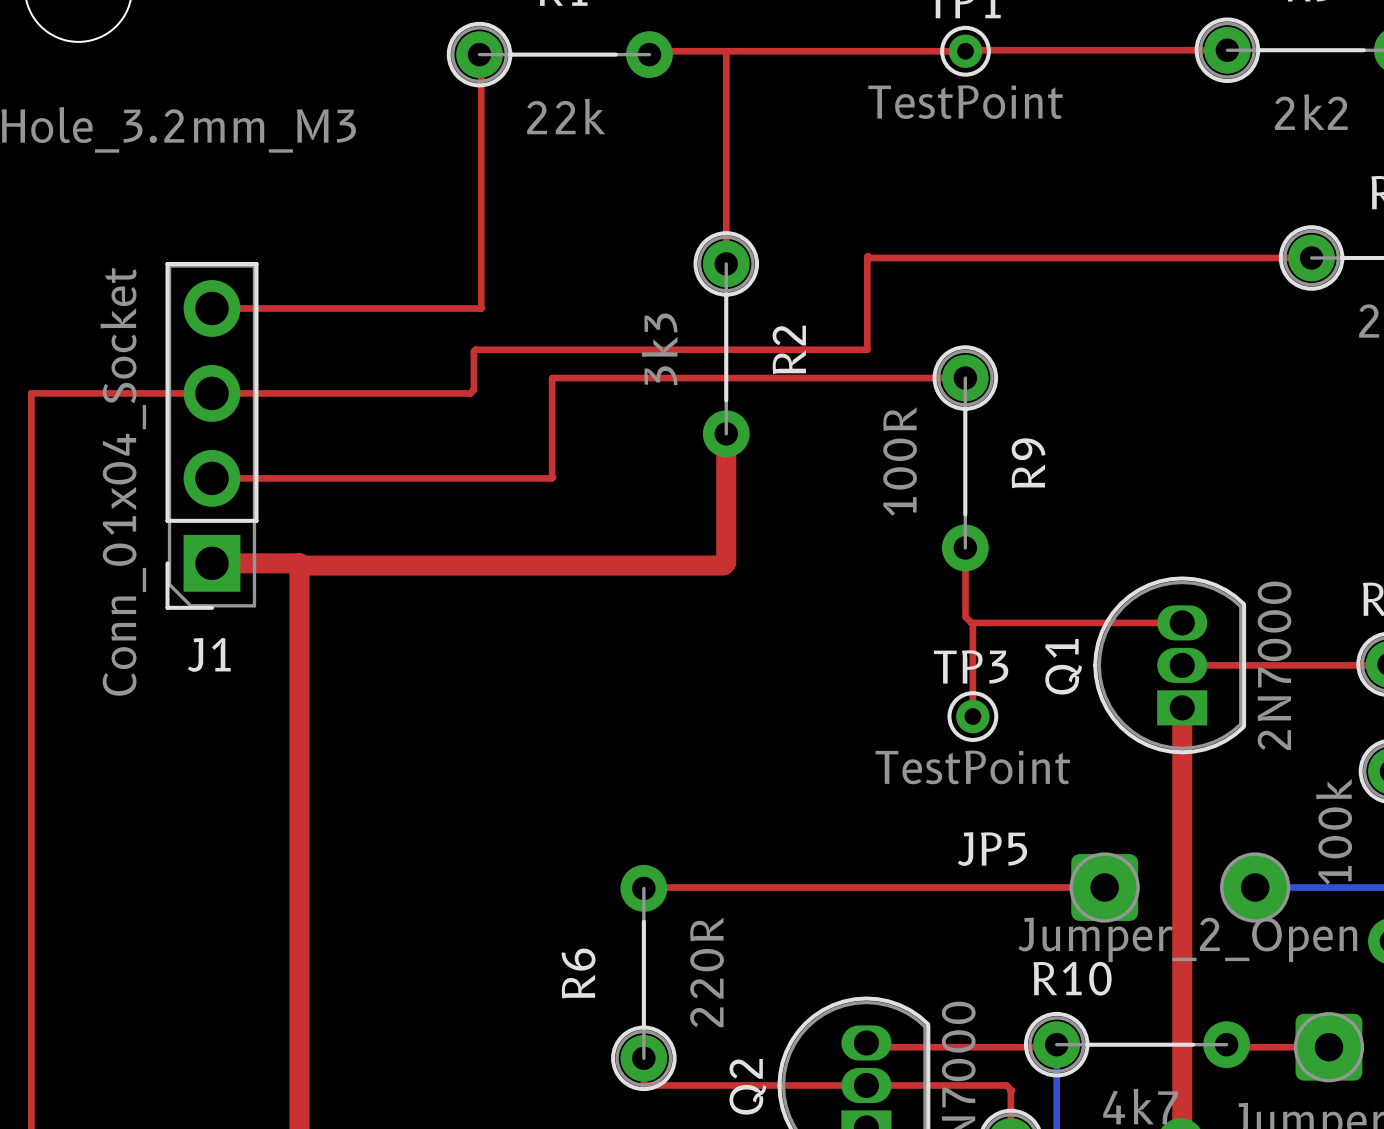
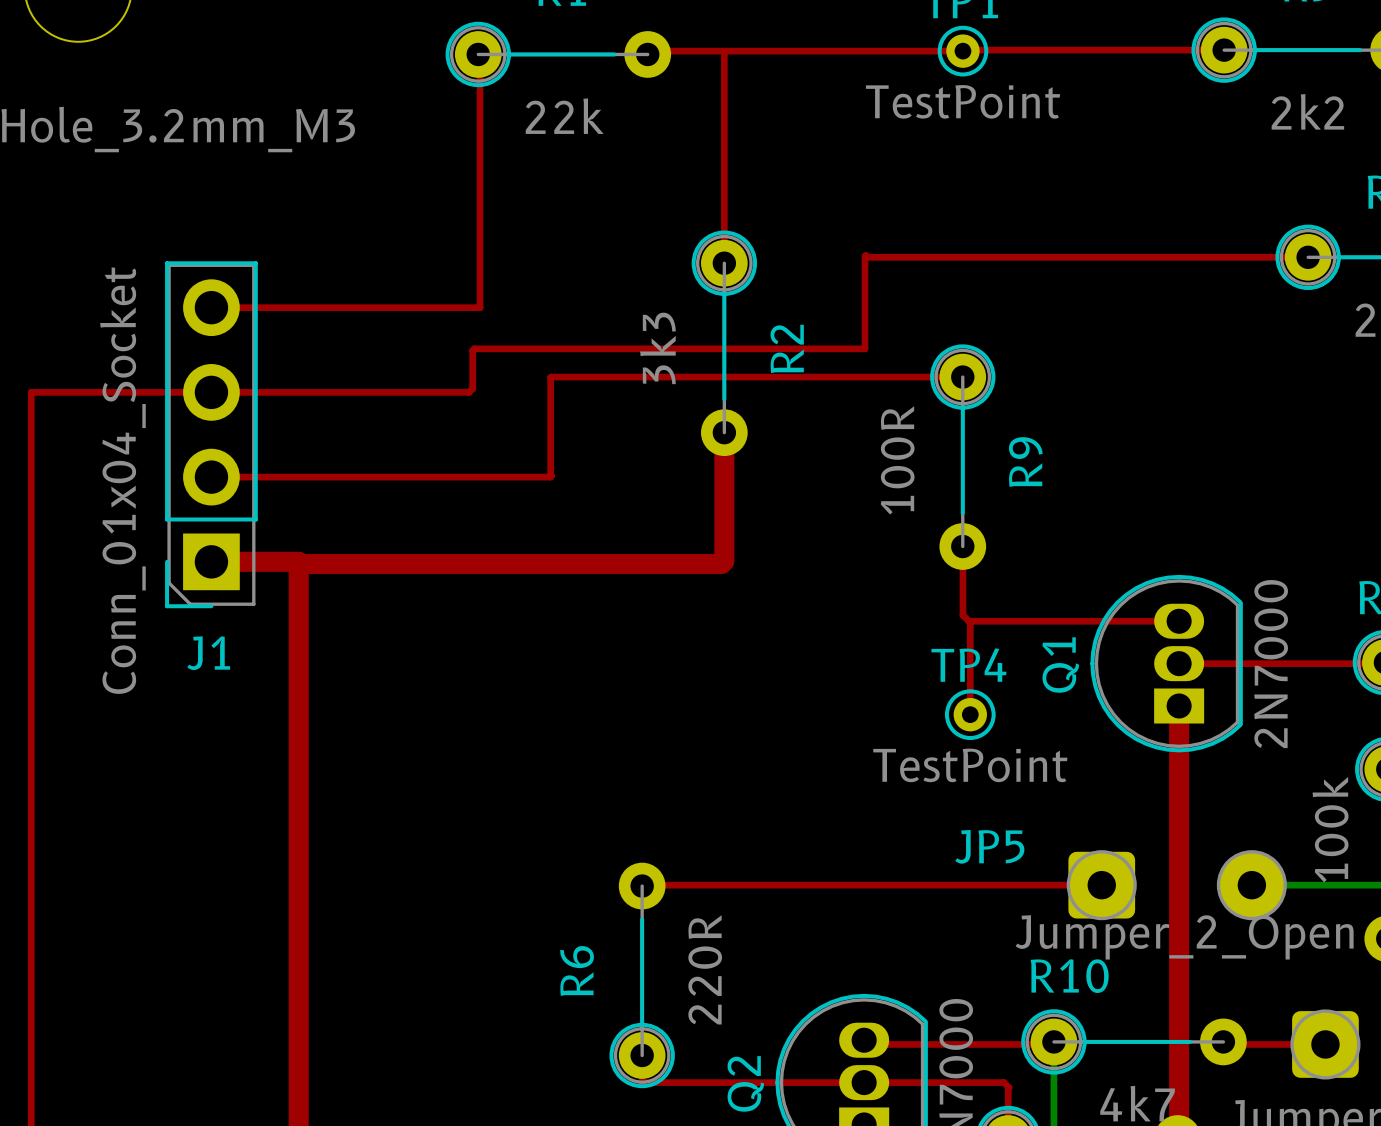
TP3 name: TP3 (971, 666) -> TP4 (968, 665)

